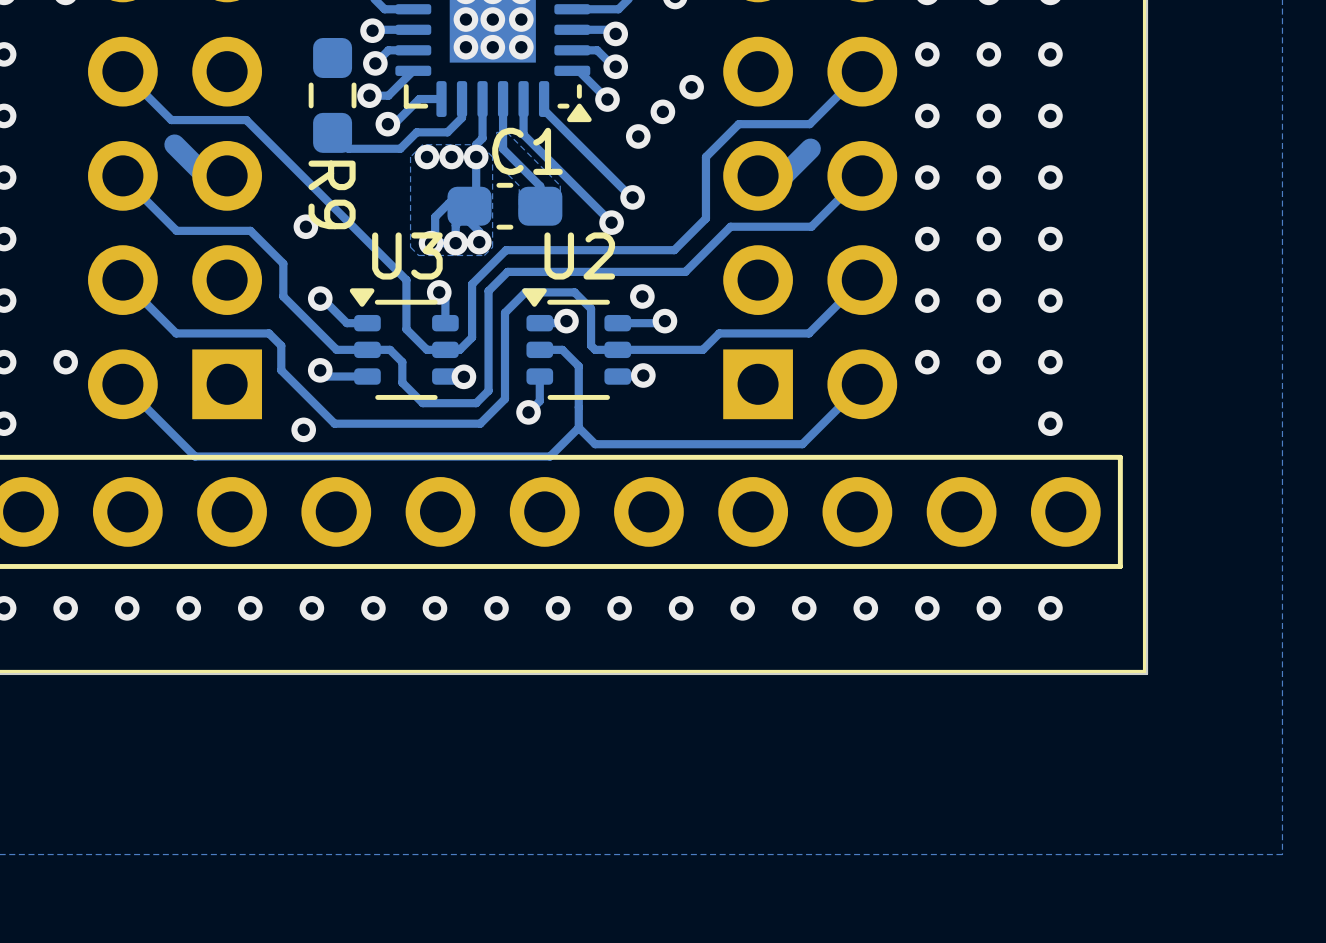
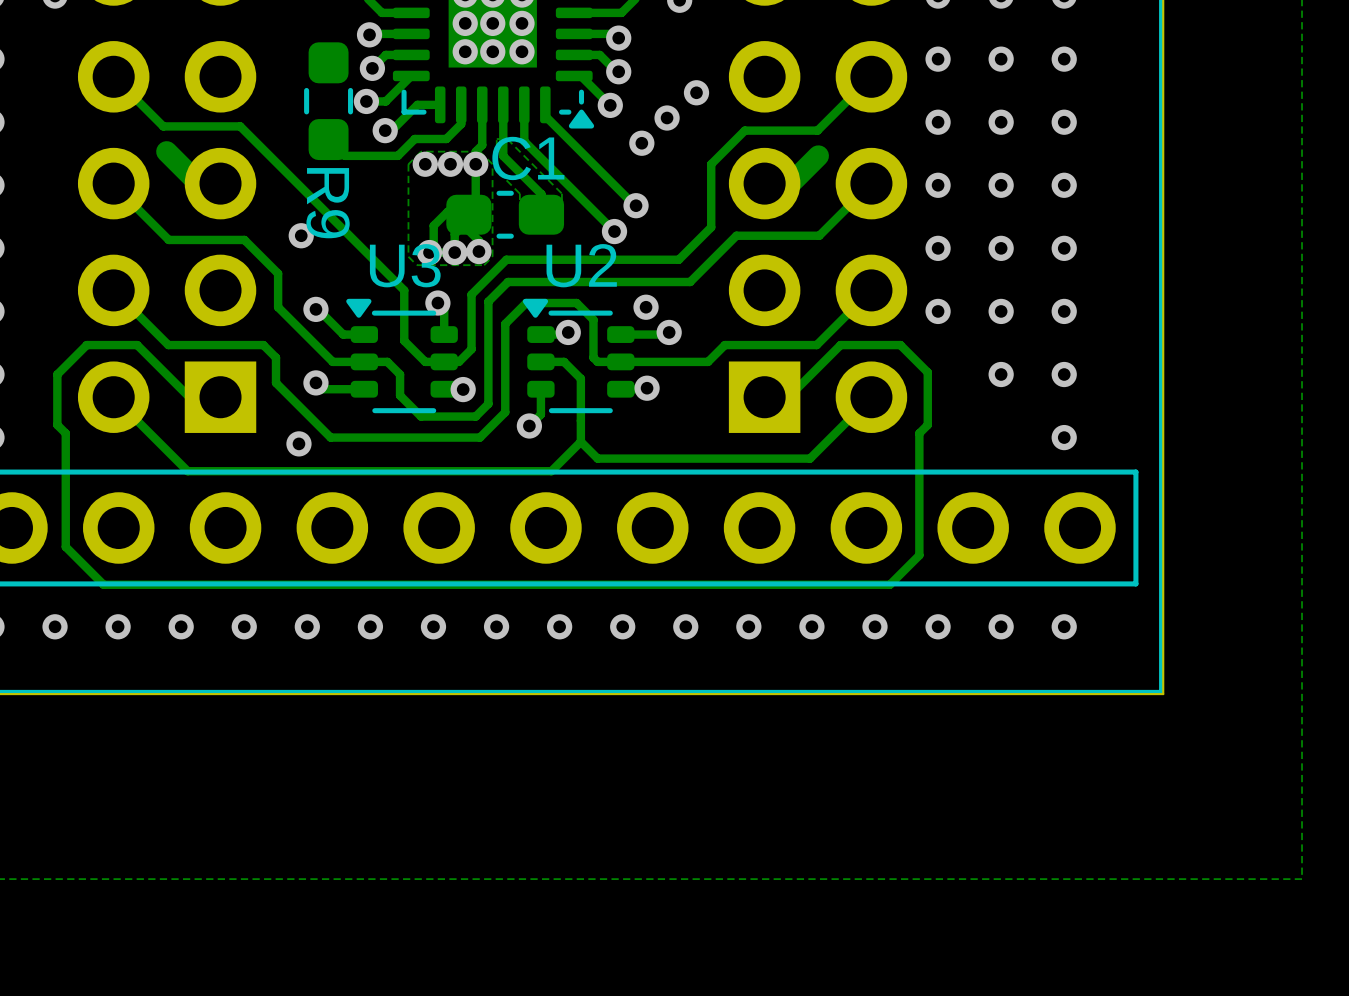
via: (65, 362) -> none
via: (927, 362) -> none
track: none -> (764, 397) (788, 397) (840, 345) (900, 345) (927, 372) (927, 424) (919, 433) (919, 555) (889, 584) (103, 584) (65, 546) (65, 433) (57, 424) (57, 374) (86, 345) (137, 345) (189, 397) (220, 397)

